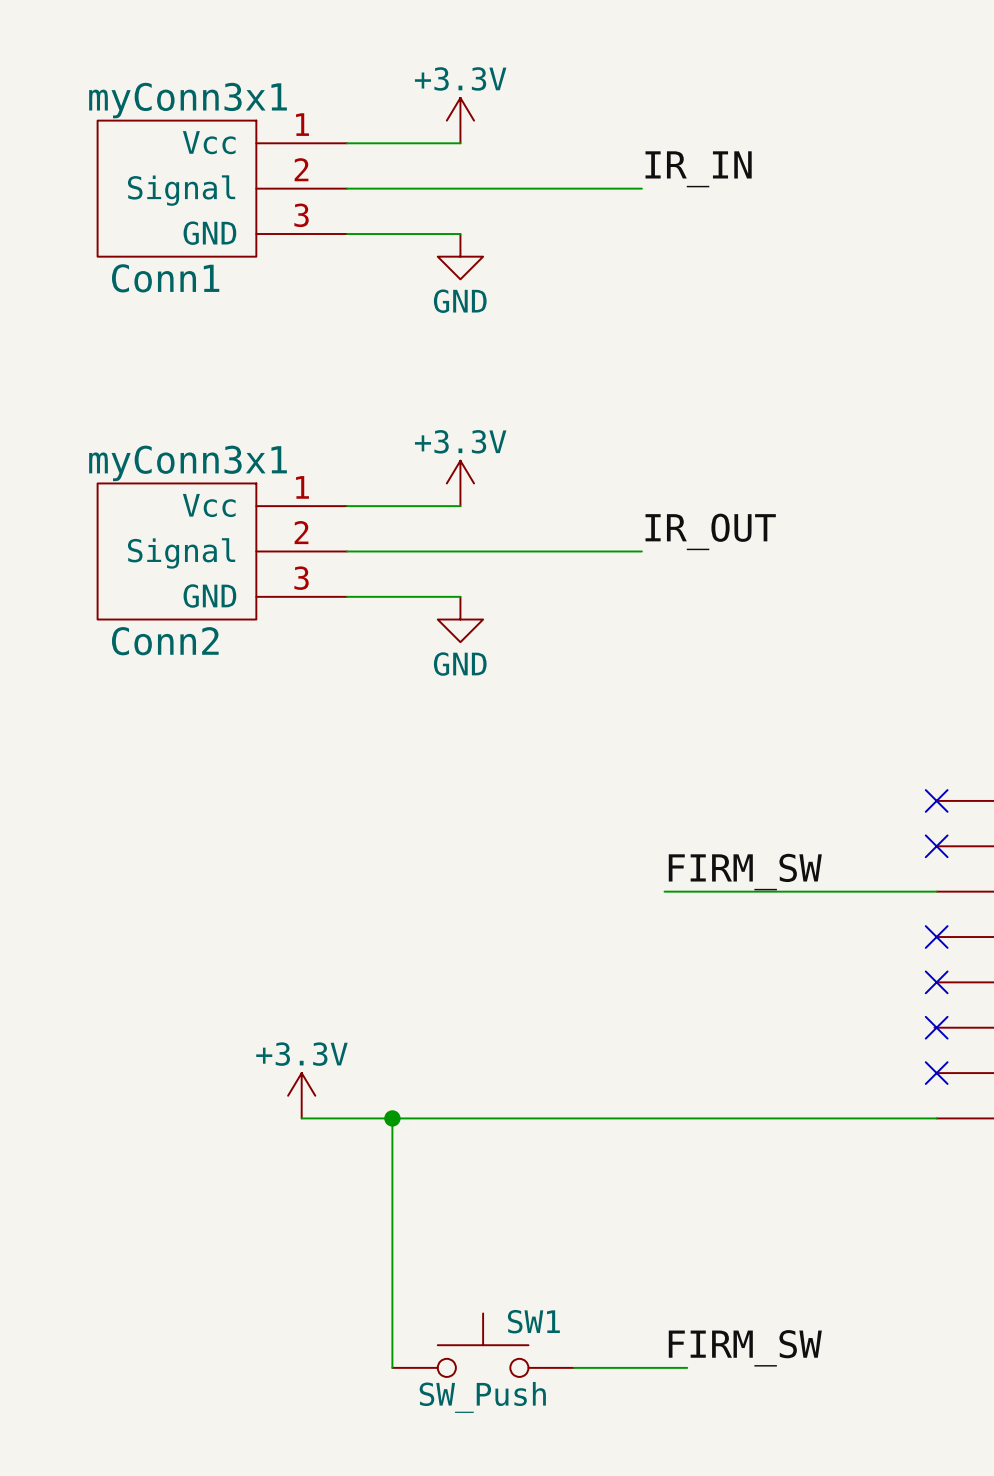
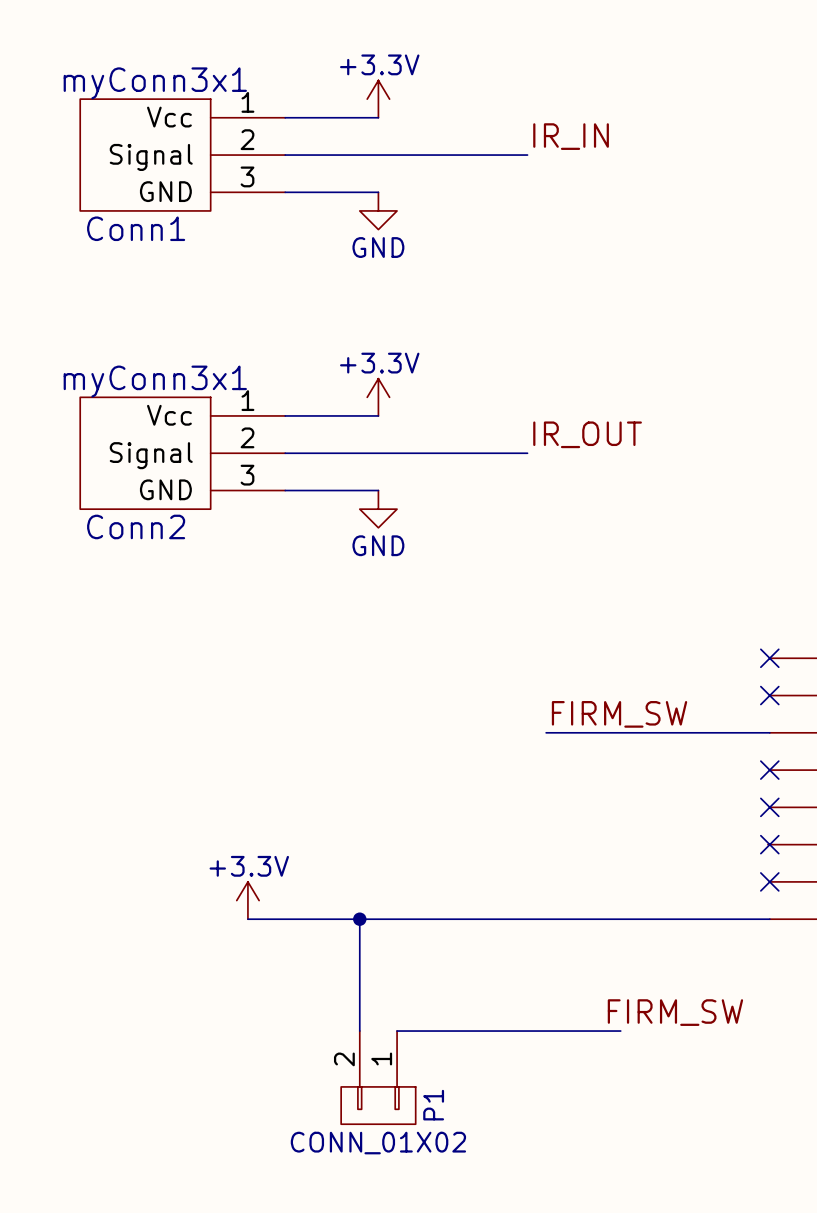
wire: (392, 1118) (392, 1367) -> none
junction position: (392, 1118) -> (359, 919)
wire: none -> (359, 919) (359, 1031)
wire: none -> (397, 1031) (620, 1031)
P1: none -> CONN_01X02 (378, 1077)
SW1: SW_Push (483, 1345) -> none
label position: FIRM_SW (745, 1348) -> FIRM_SW (675, 1012)
wire: (573, 1367) (687, 1367) -> none

